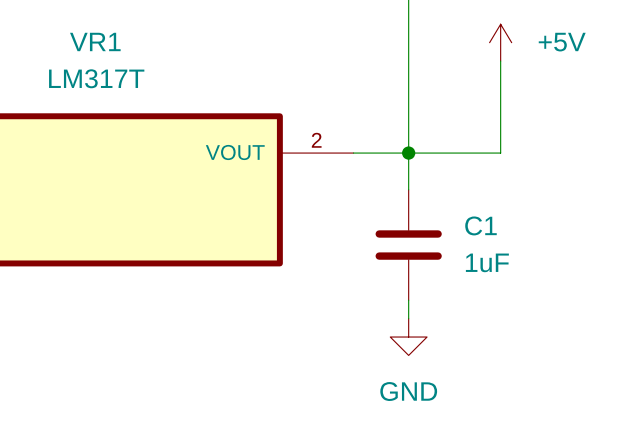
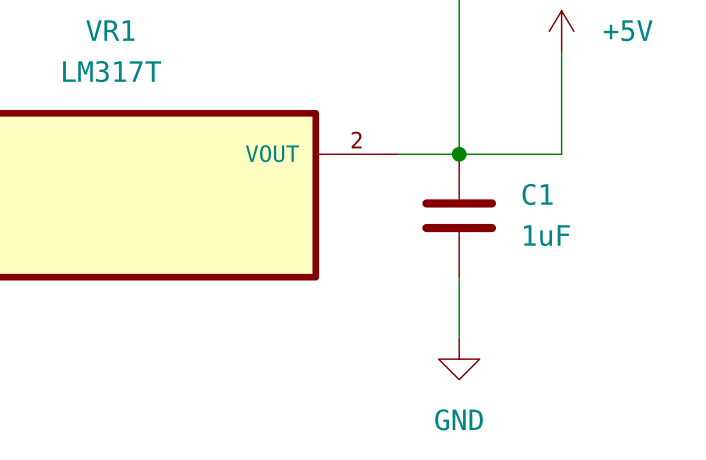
C1 position: (408, 245) -> (459, 215)

